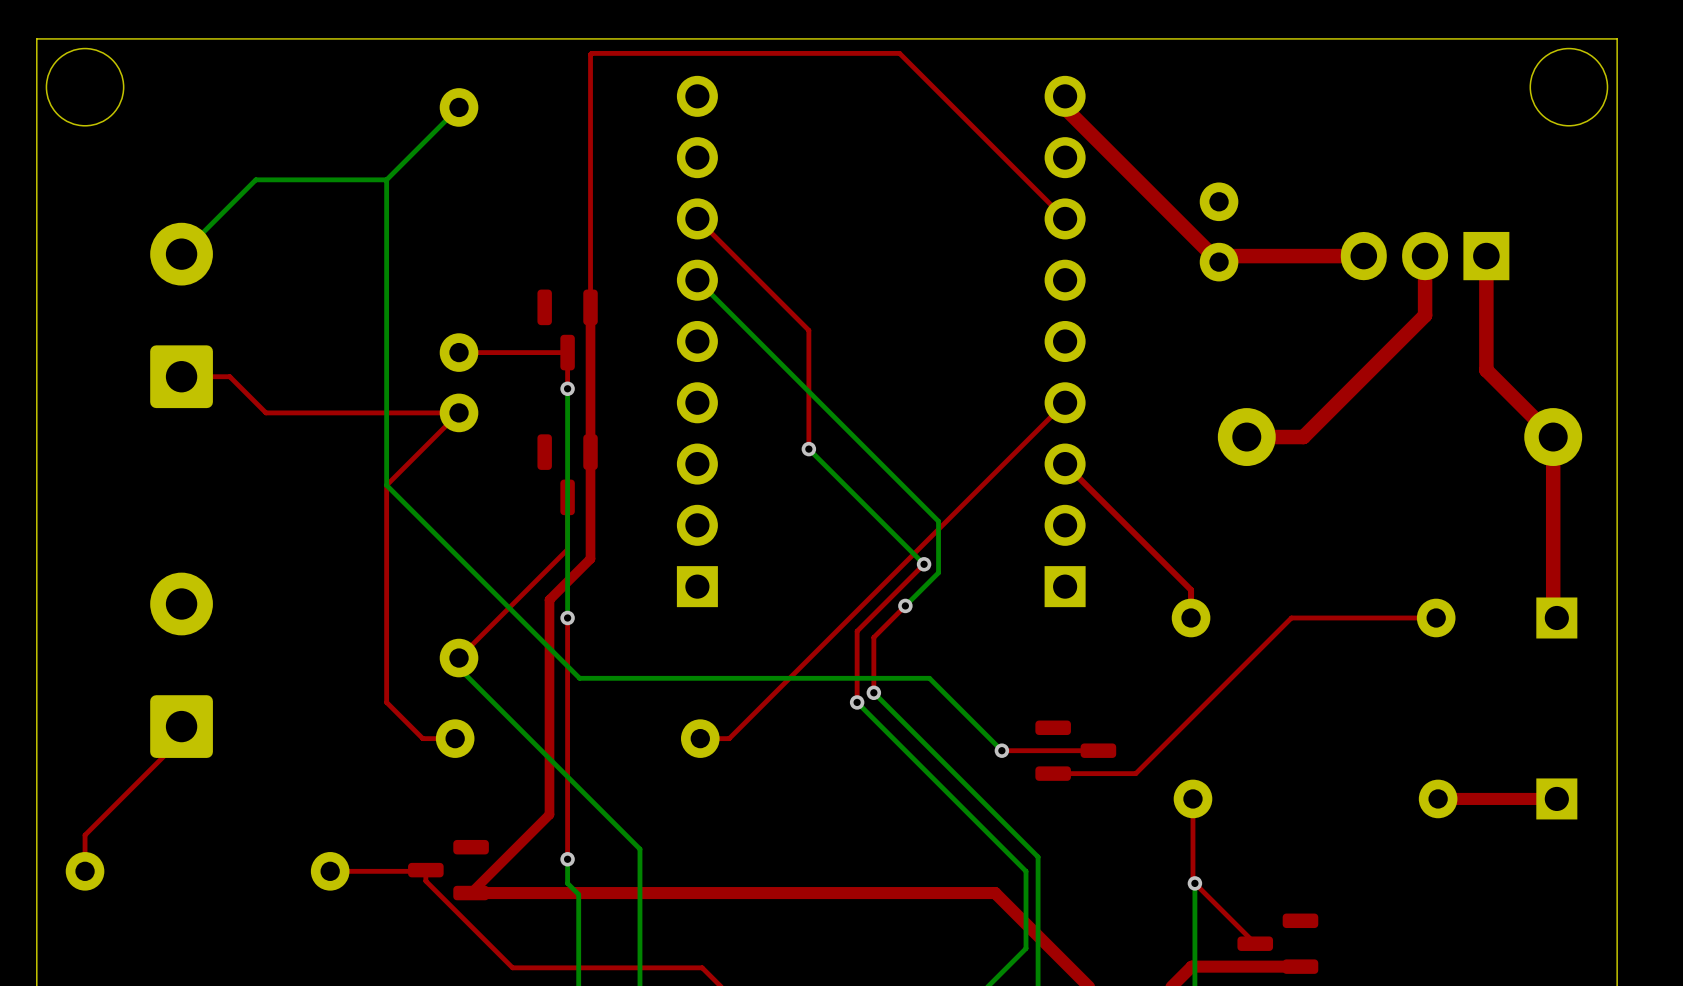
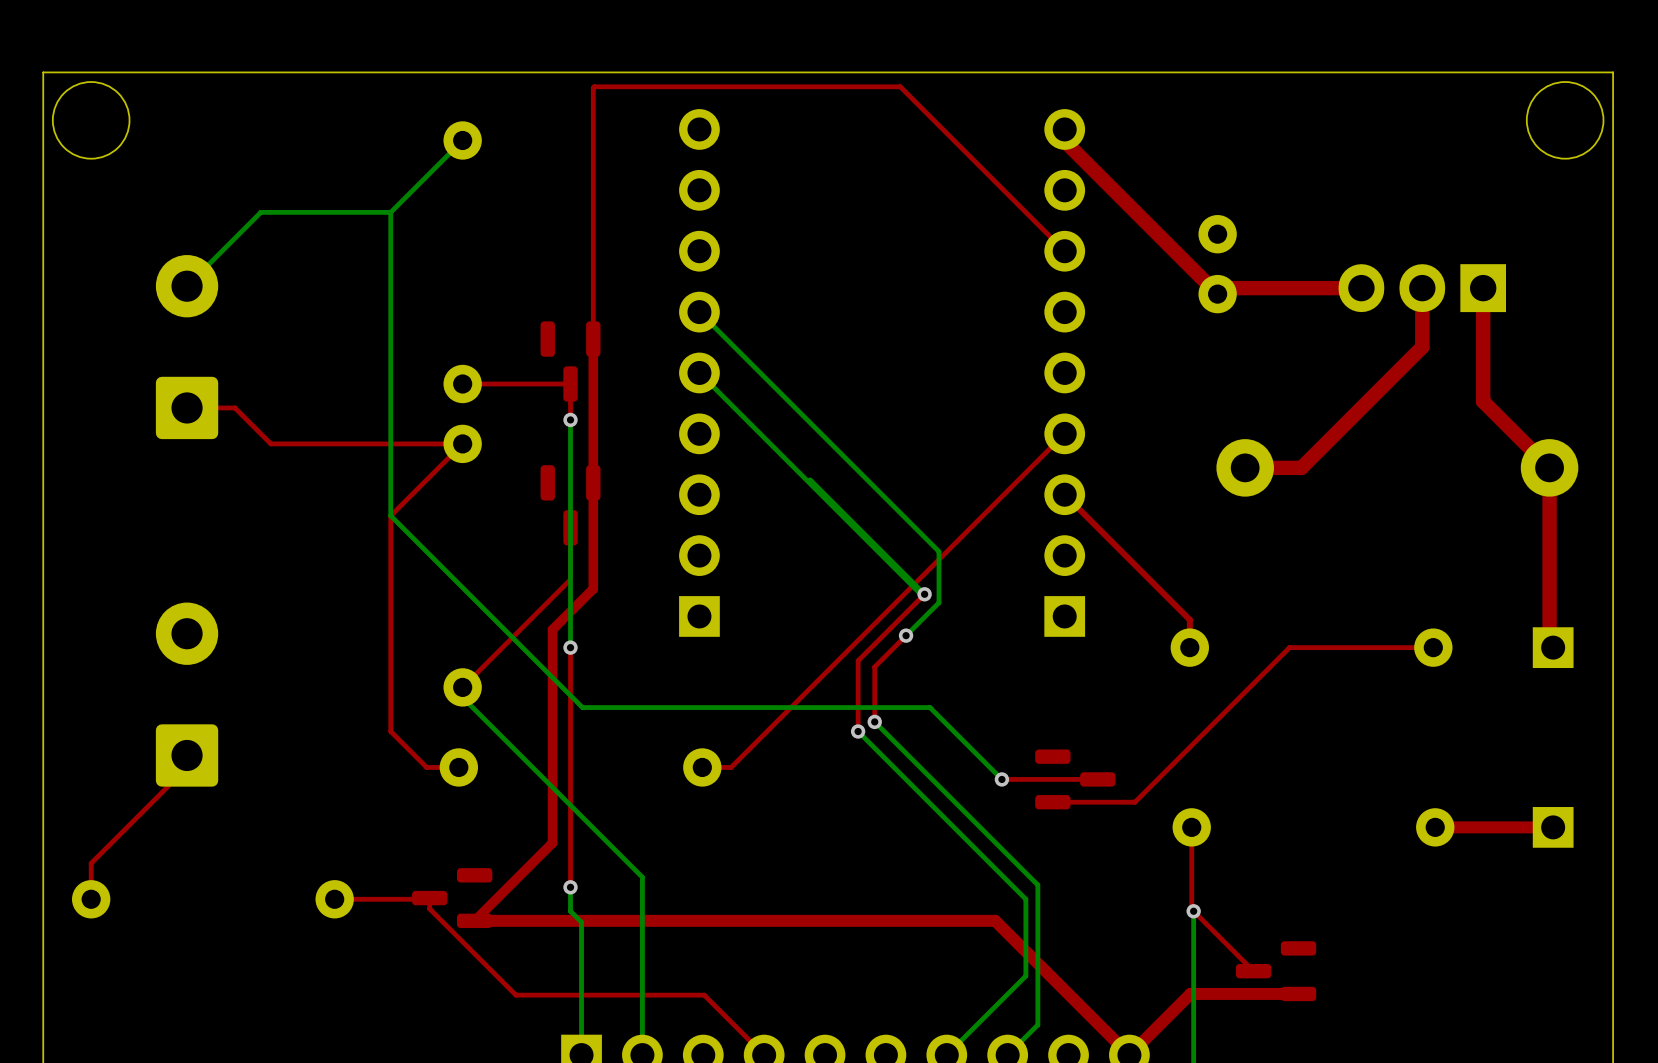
top track: (697, 218) (808, 330) (808, 449) -> none
bottom track: none -> (699, 372) (920, 594)
via: (808, 449) -> none

